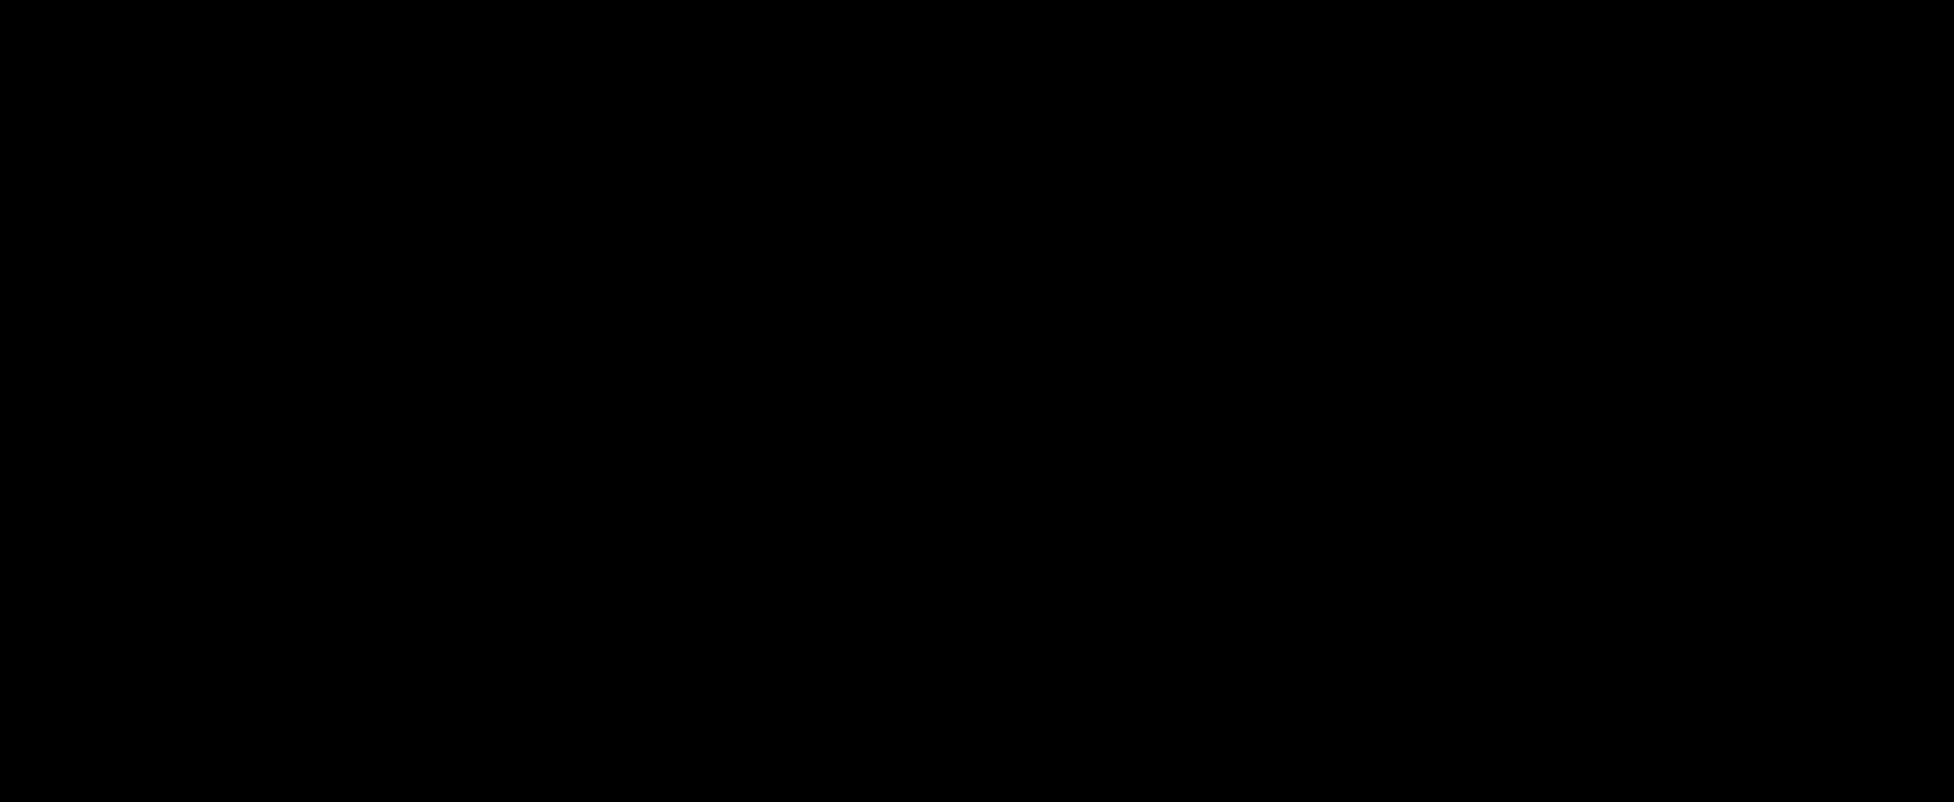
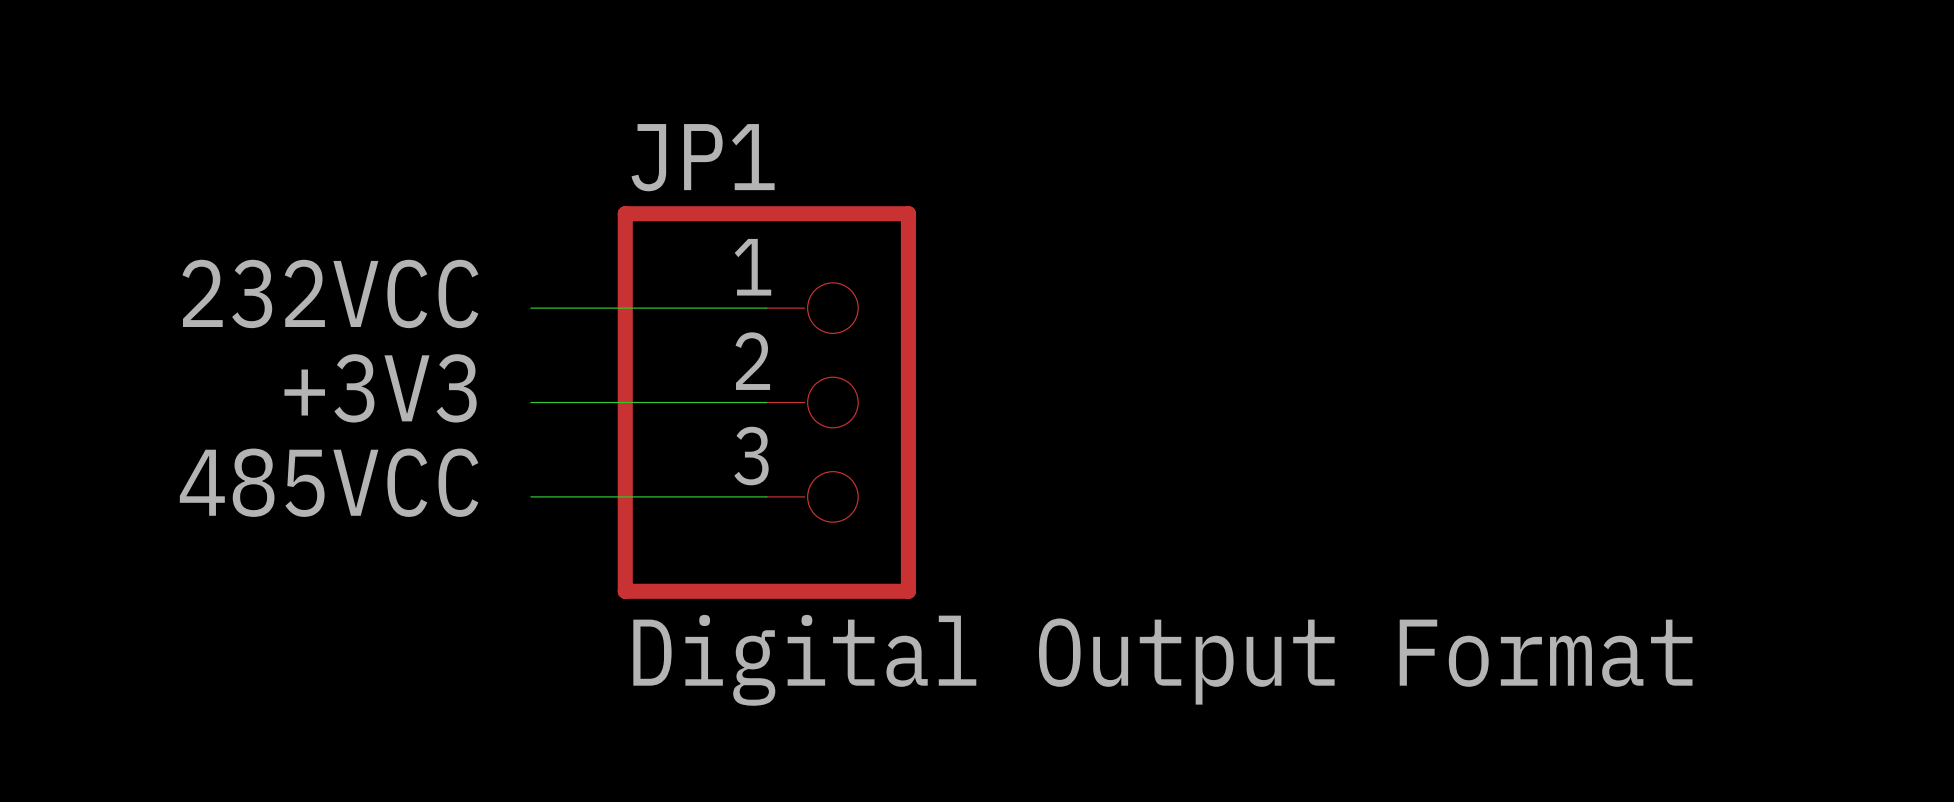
label: none -> 232VCC (330, 293)
wire: none -> (530, 308) (766, 308)
label: none -> +3V3 (380, 388)
wire: none -> (530, 402) (766, 402)
JP1: none -> Digital Output Format (766, 402)
label: none -> 485VCC (329, 482)
wire: none -> (530, 496) (766, 496)

